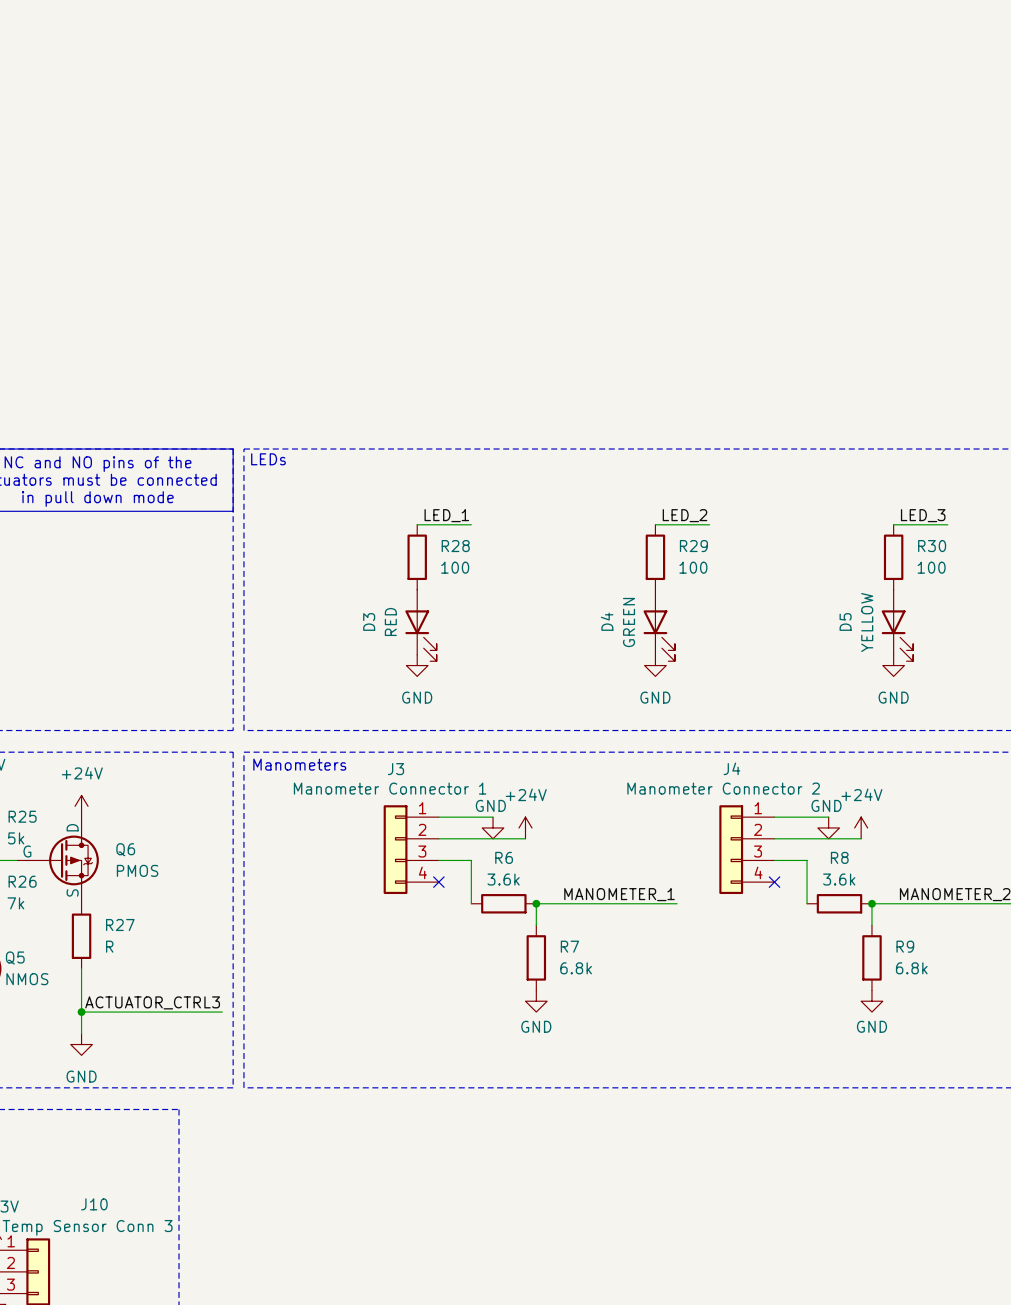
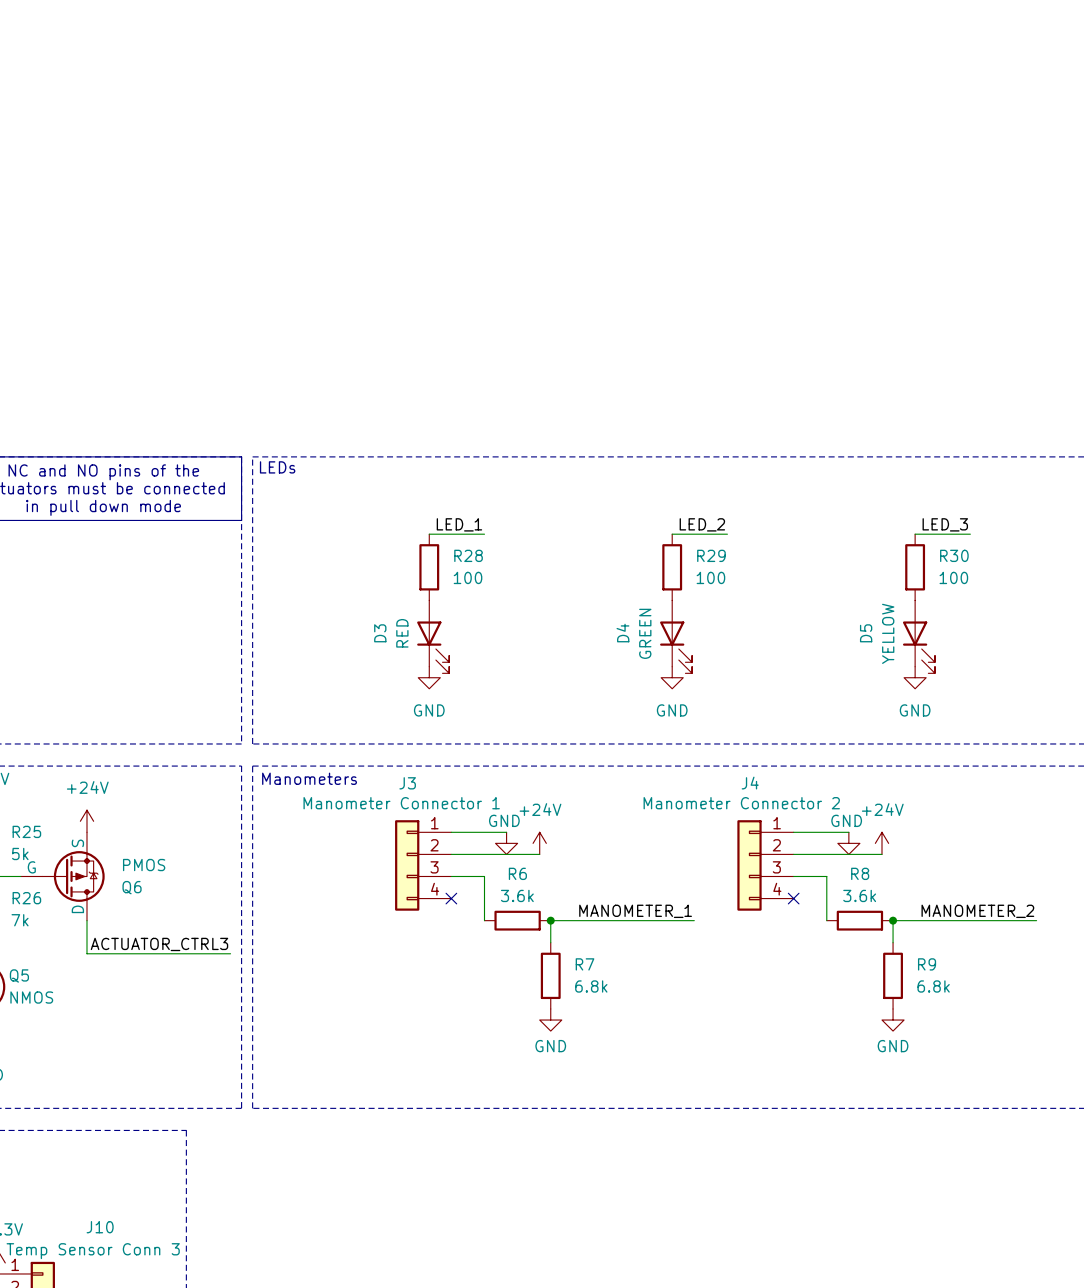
Q6 flip: as is (68, 860) -> up-down (73, 876)
wire: none -> (86, 920) (86, 953) (230, 953)
R27: R (81, 936) -> none
wire: (81, 968) (81, 1033) -> none
label position: ACTUATOR_CTRL3 (152, 1002) -> ACTUATOR_CTRL3 (159, 944)
wire: (81, 1012) (222, 1012) -> none
junction: (81, 1012) -> none
power symbol: GND (81, 1044) -> none

